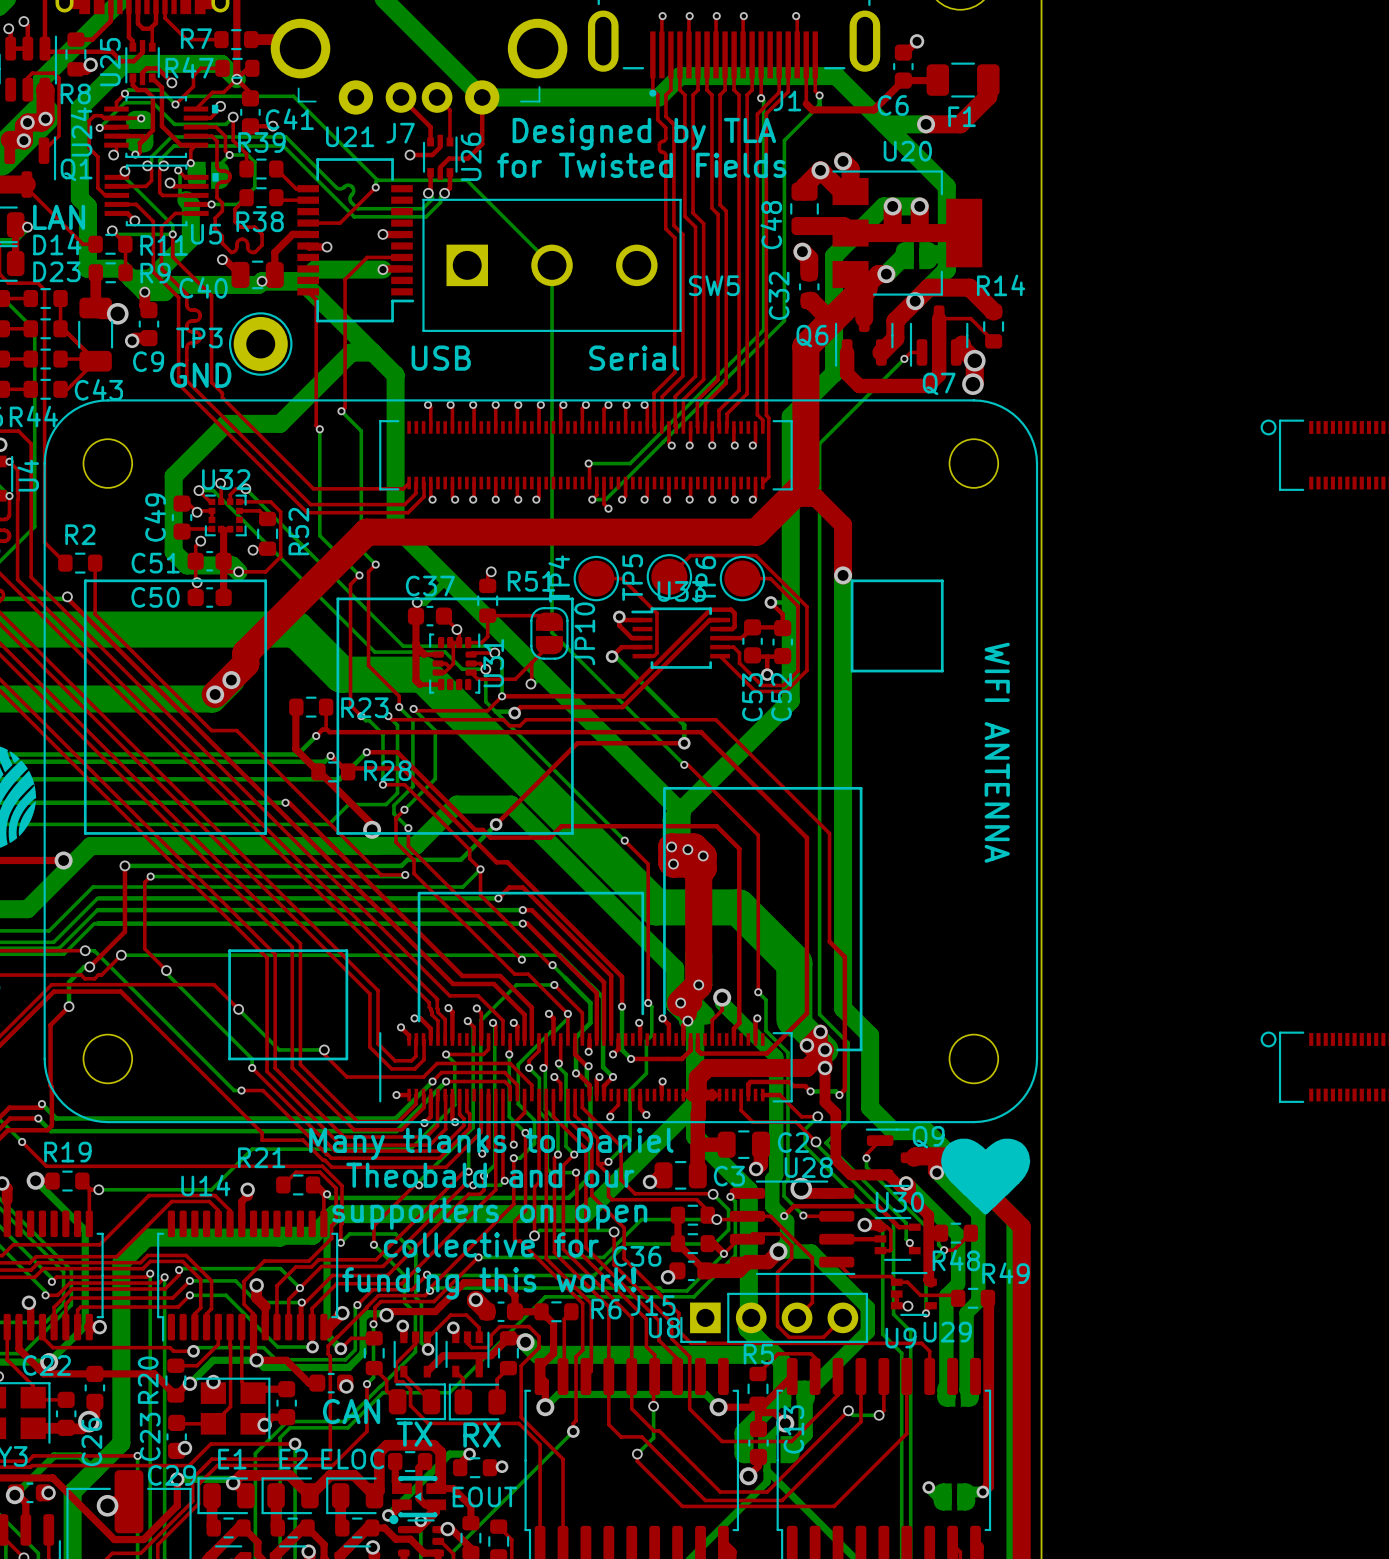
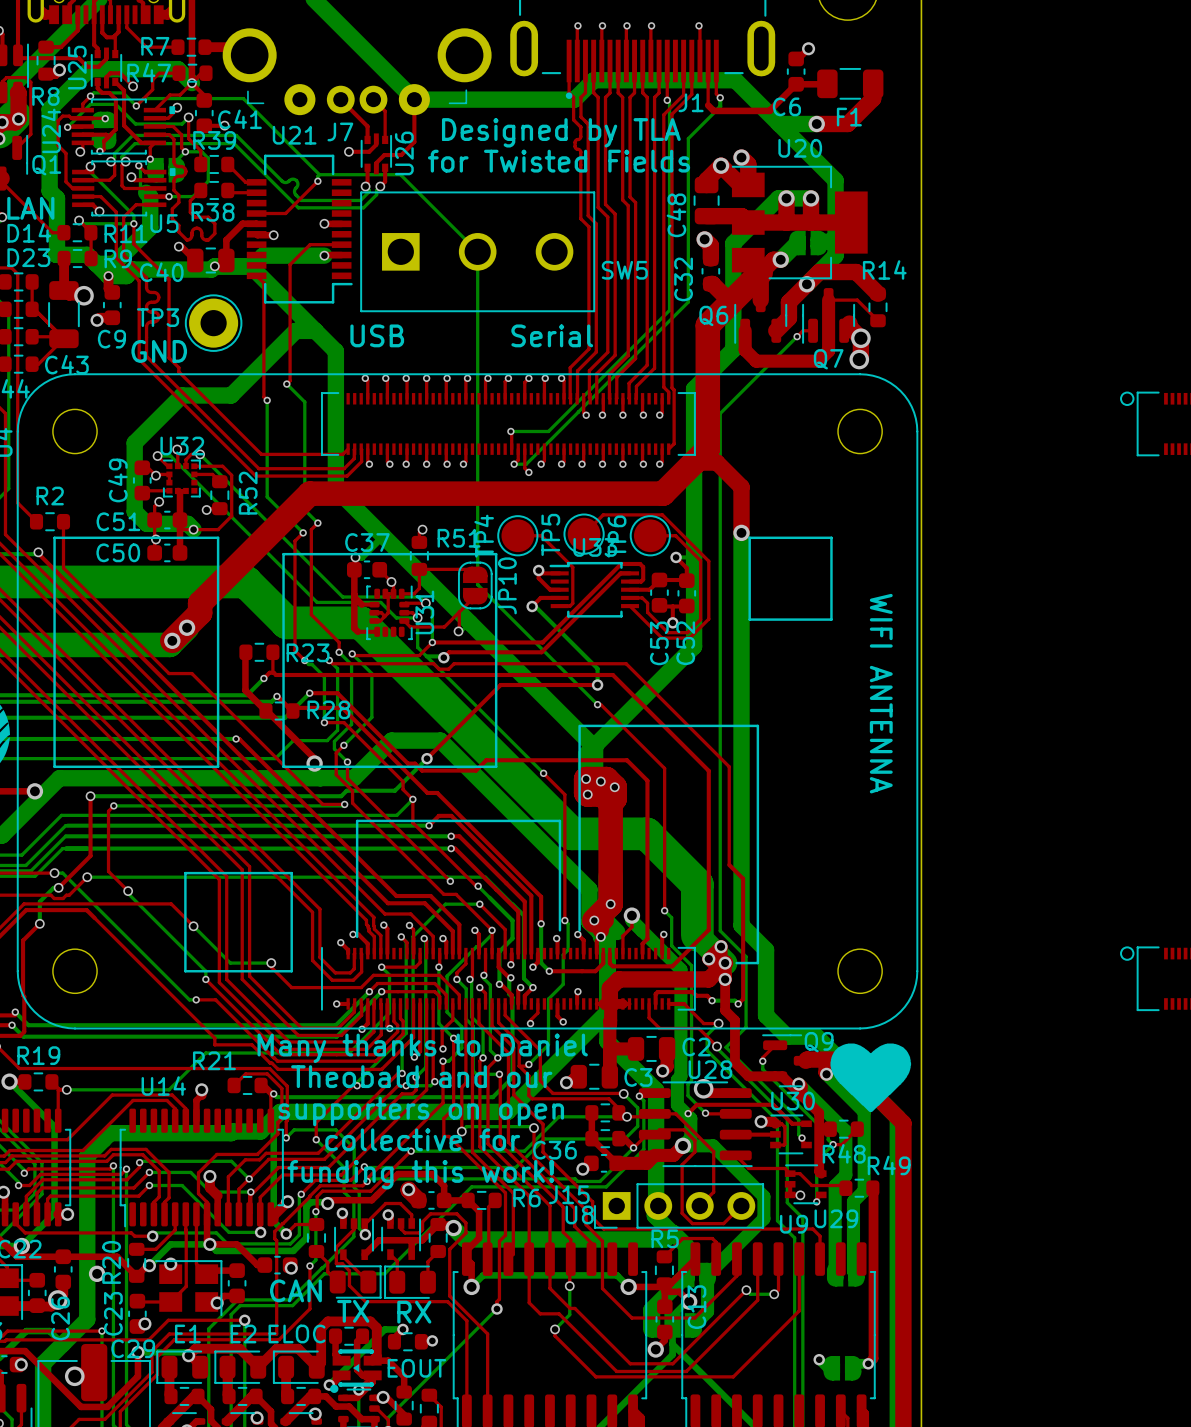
via: none -> (97, 1273)

